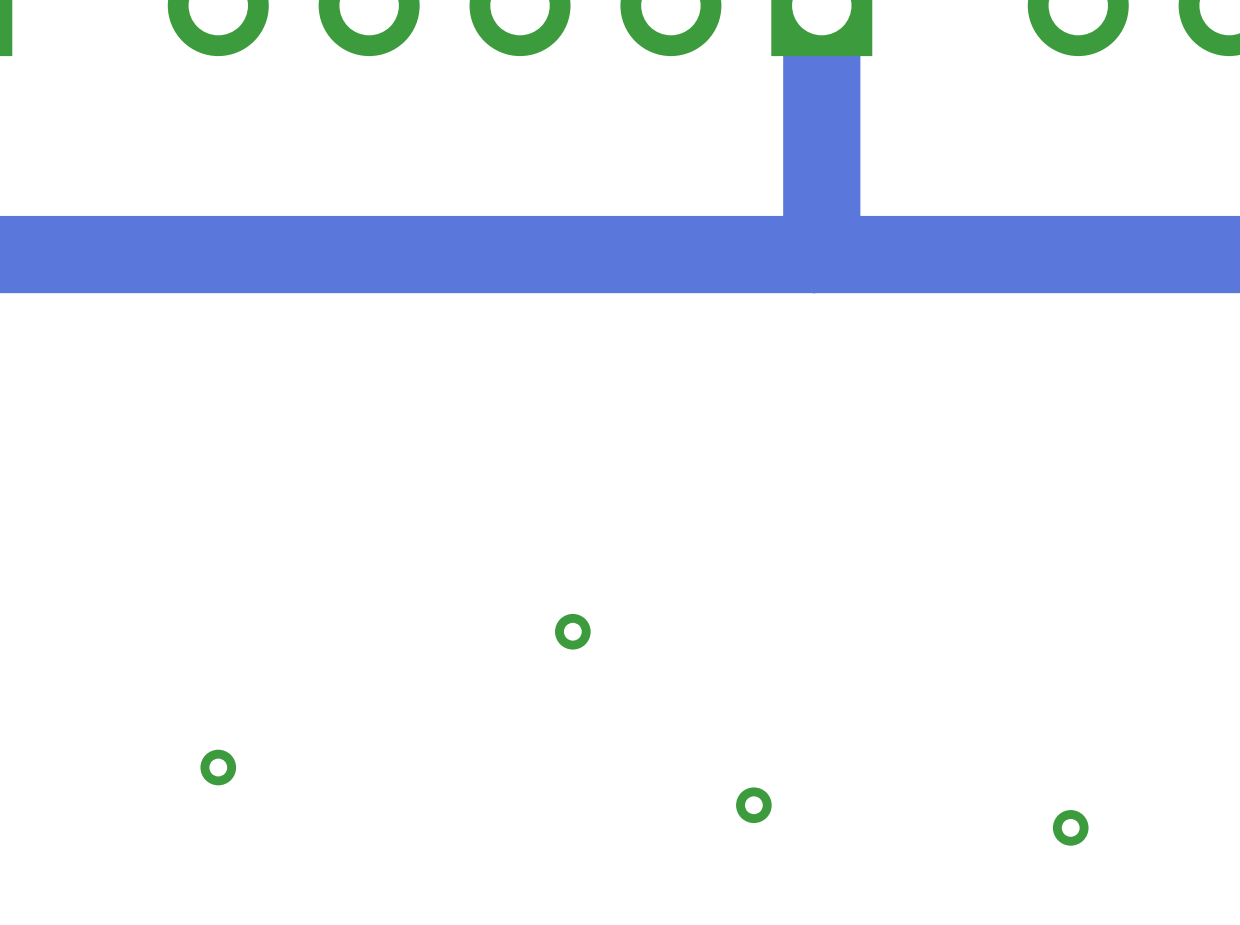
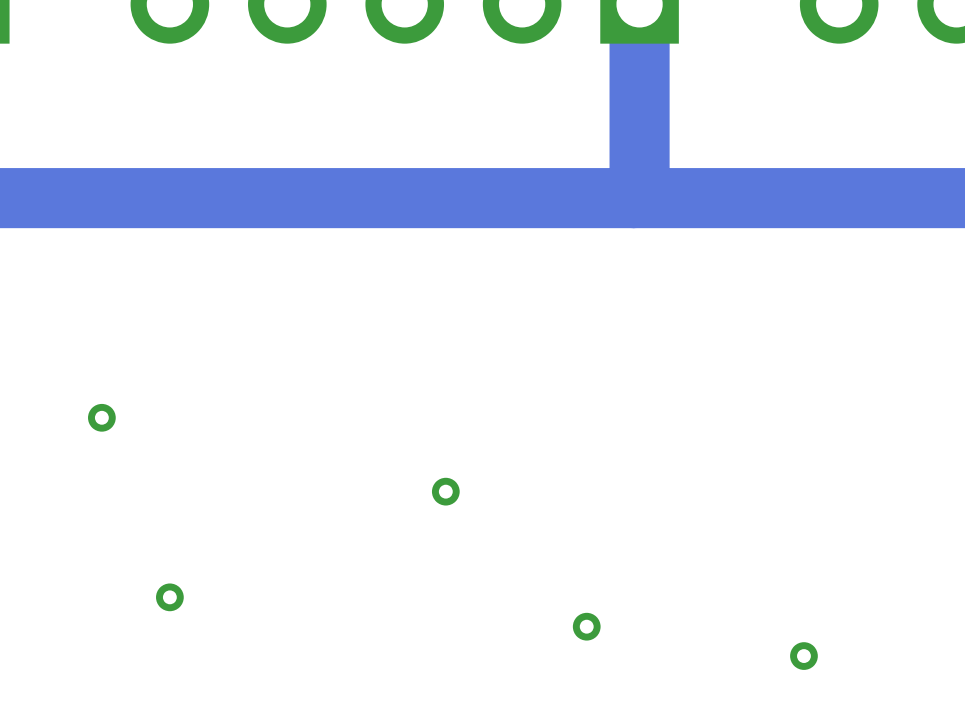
via: none -> (101, 417)
via position: (1070, 827) -> (803, 656)

